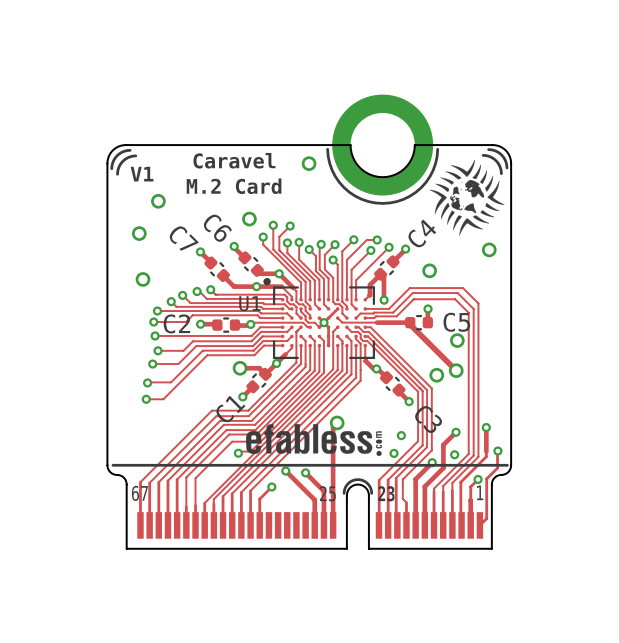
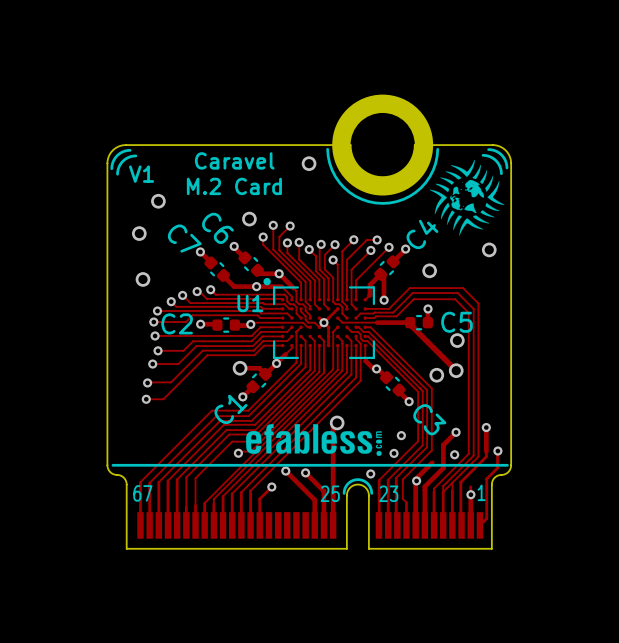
via position: (432, 462) -> (416, 480)
via: none -> (370, 473)
track: (478, 479) (470, 486) -> none
via position: (478, 479) -> (470, 494)

